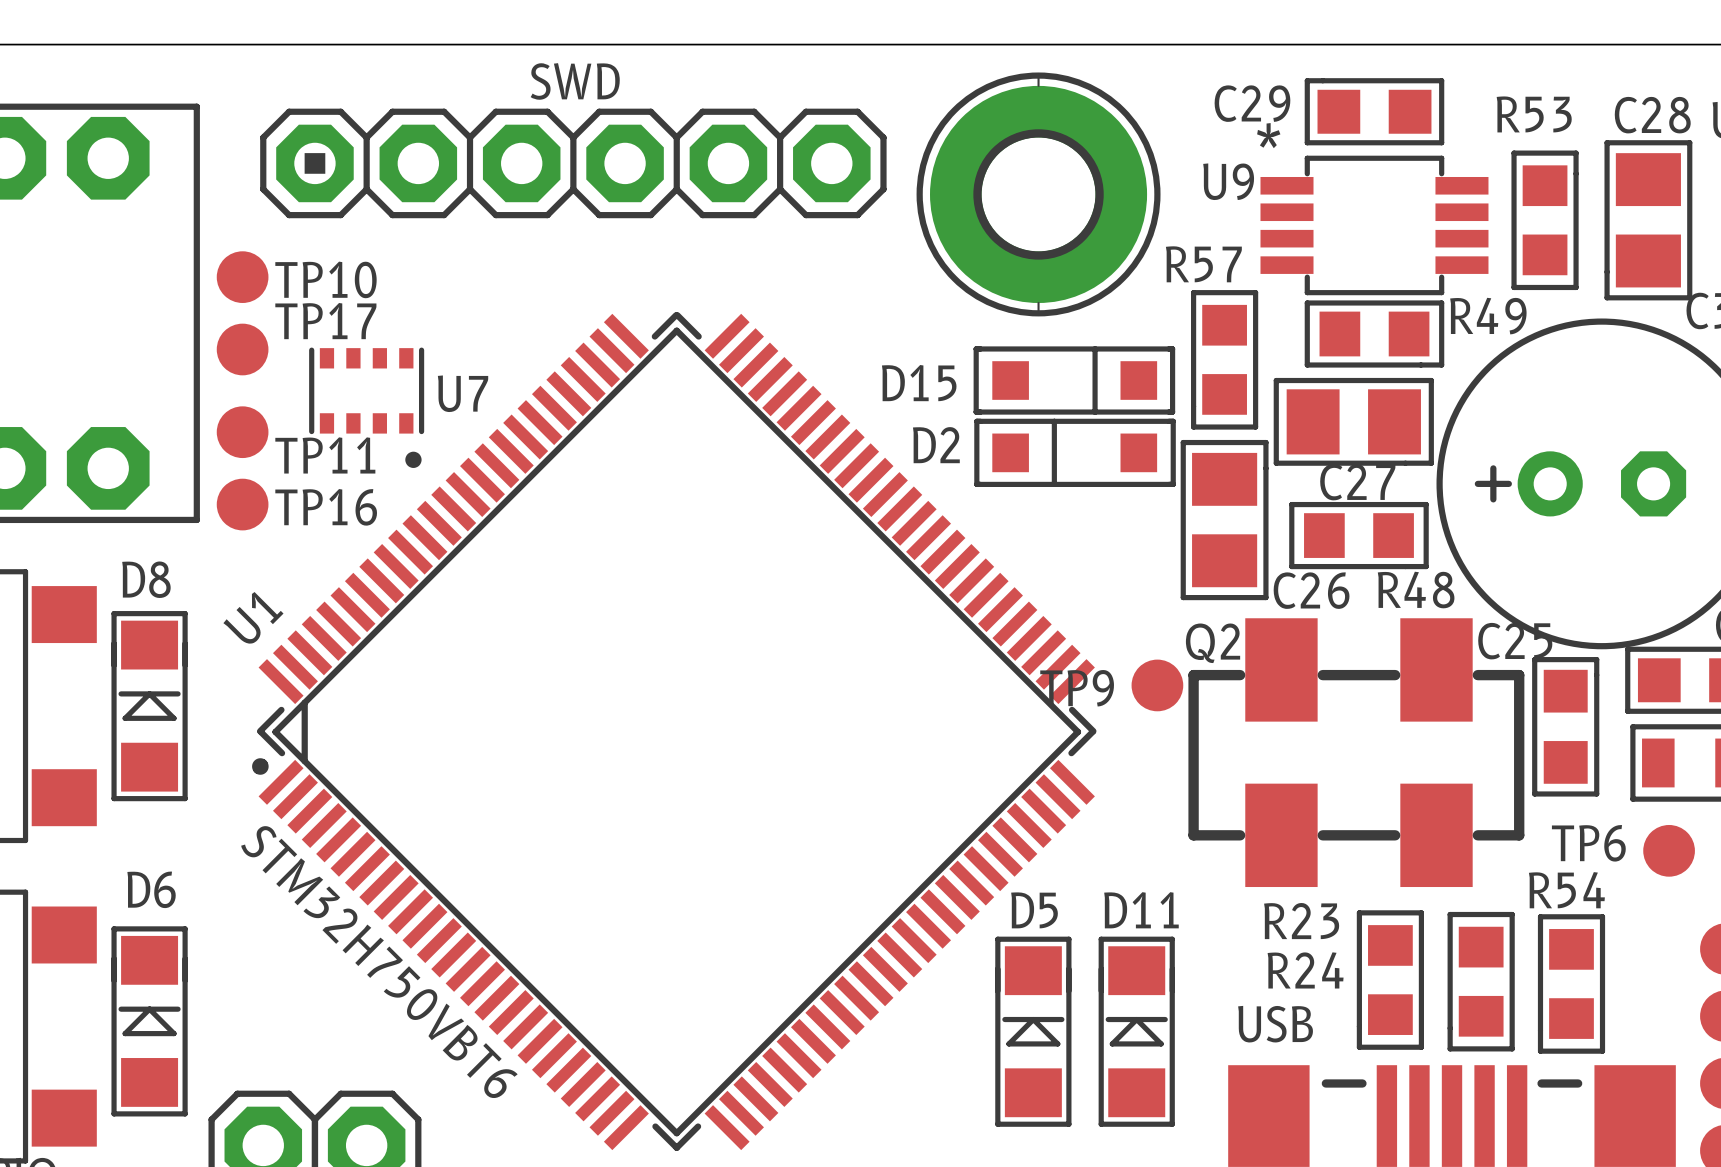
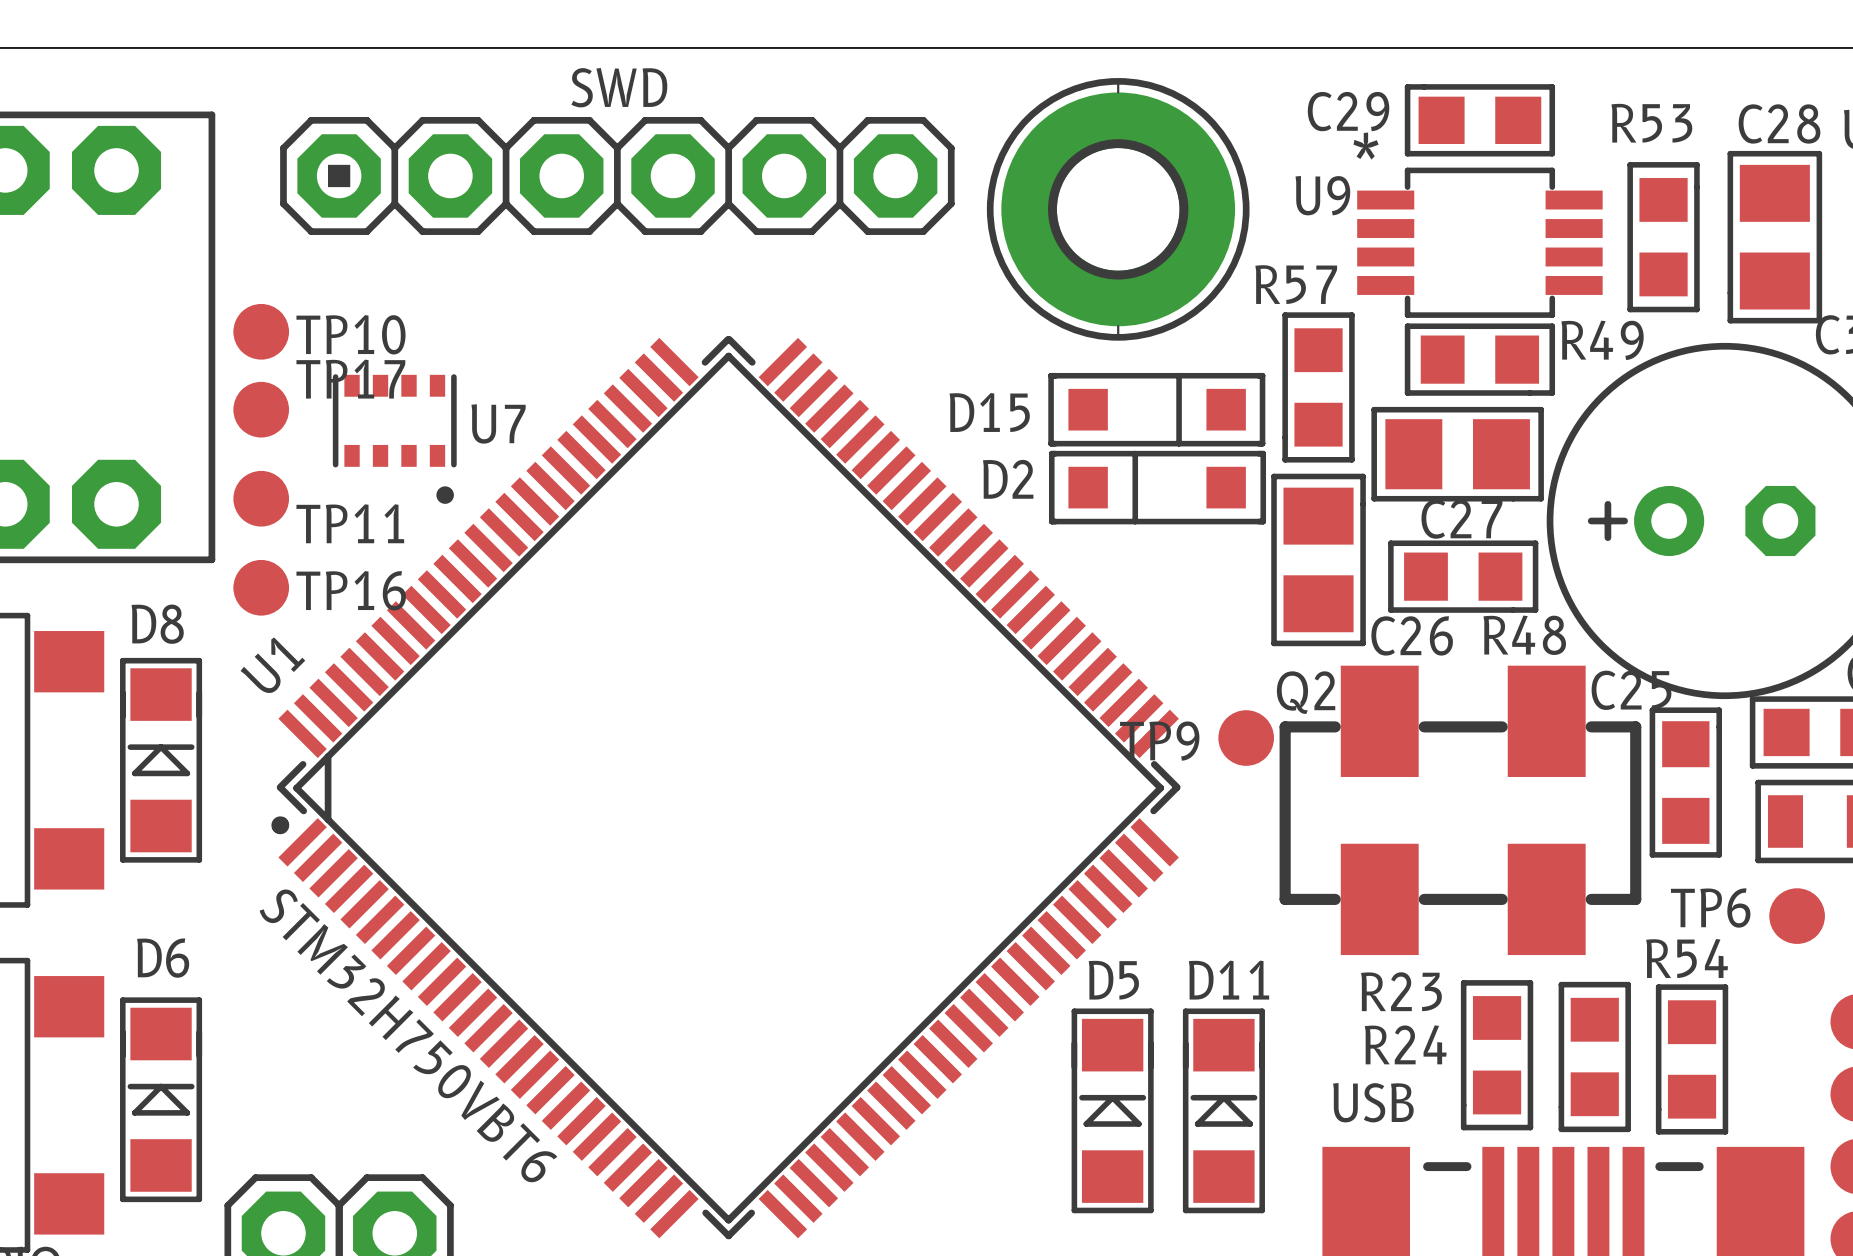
TP10 position: (242, 277) -> (261, 331)
TP17 position: (242, 349) -> (261, 409)
TP11 position: (242, 432) -> (261, 498)
TP16 position: (242, 504) -> (261, 587)

